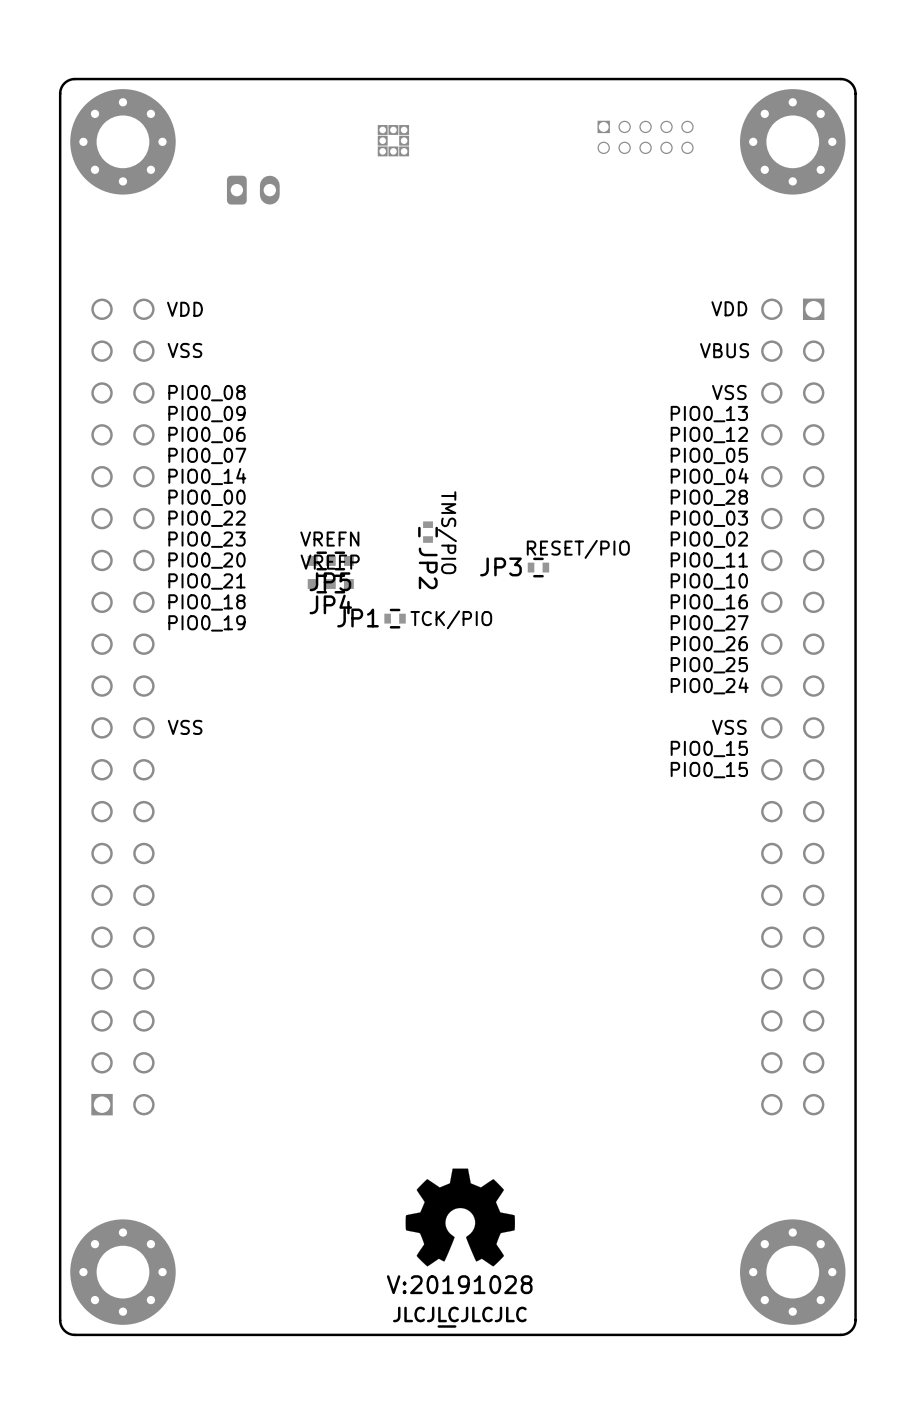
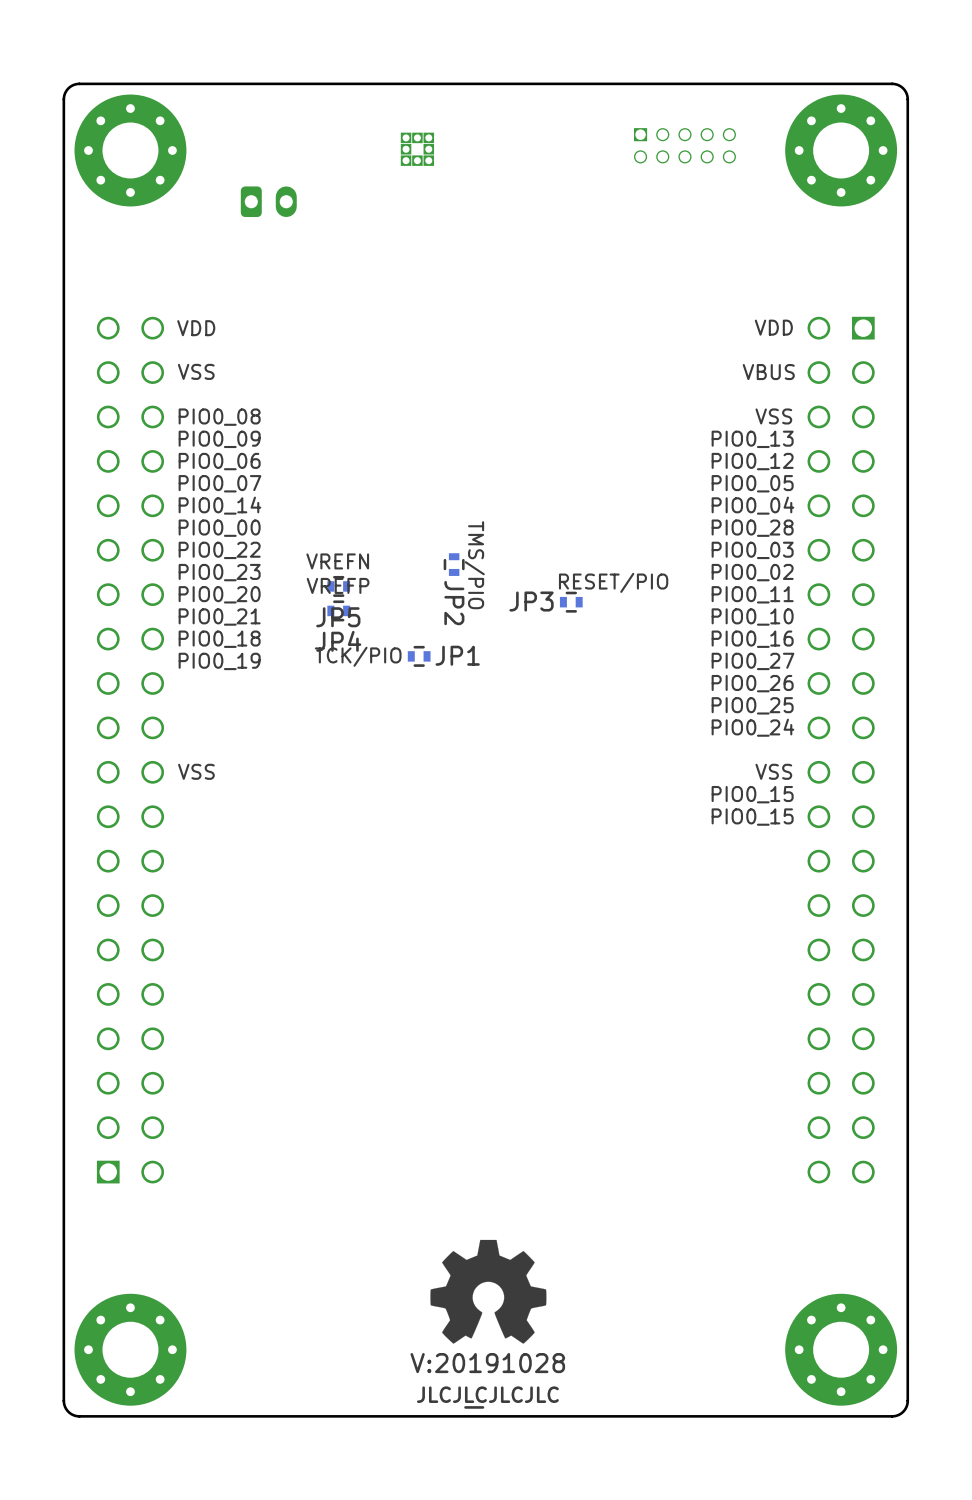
JP5 footprint: [307, 551, 354, 571] -> [327, 575, 351, 597]
JP4 footprint: [307, 574, 354, 594] -> [327, 600, 351, 622]
JP1 name position: JP1 (358, 618) -> JP1 (457, 655)
JP1 value position: TCK/PIO (451, 619) -> TCK/PIO (358, 656)

